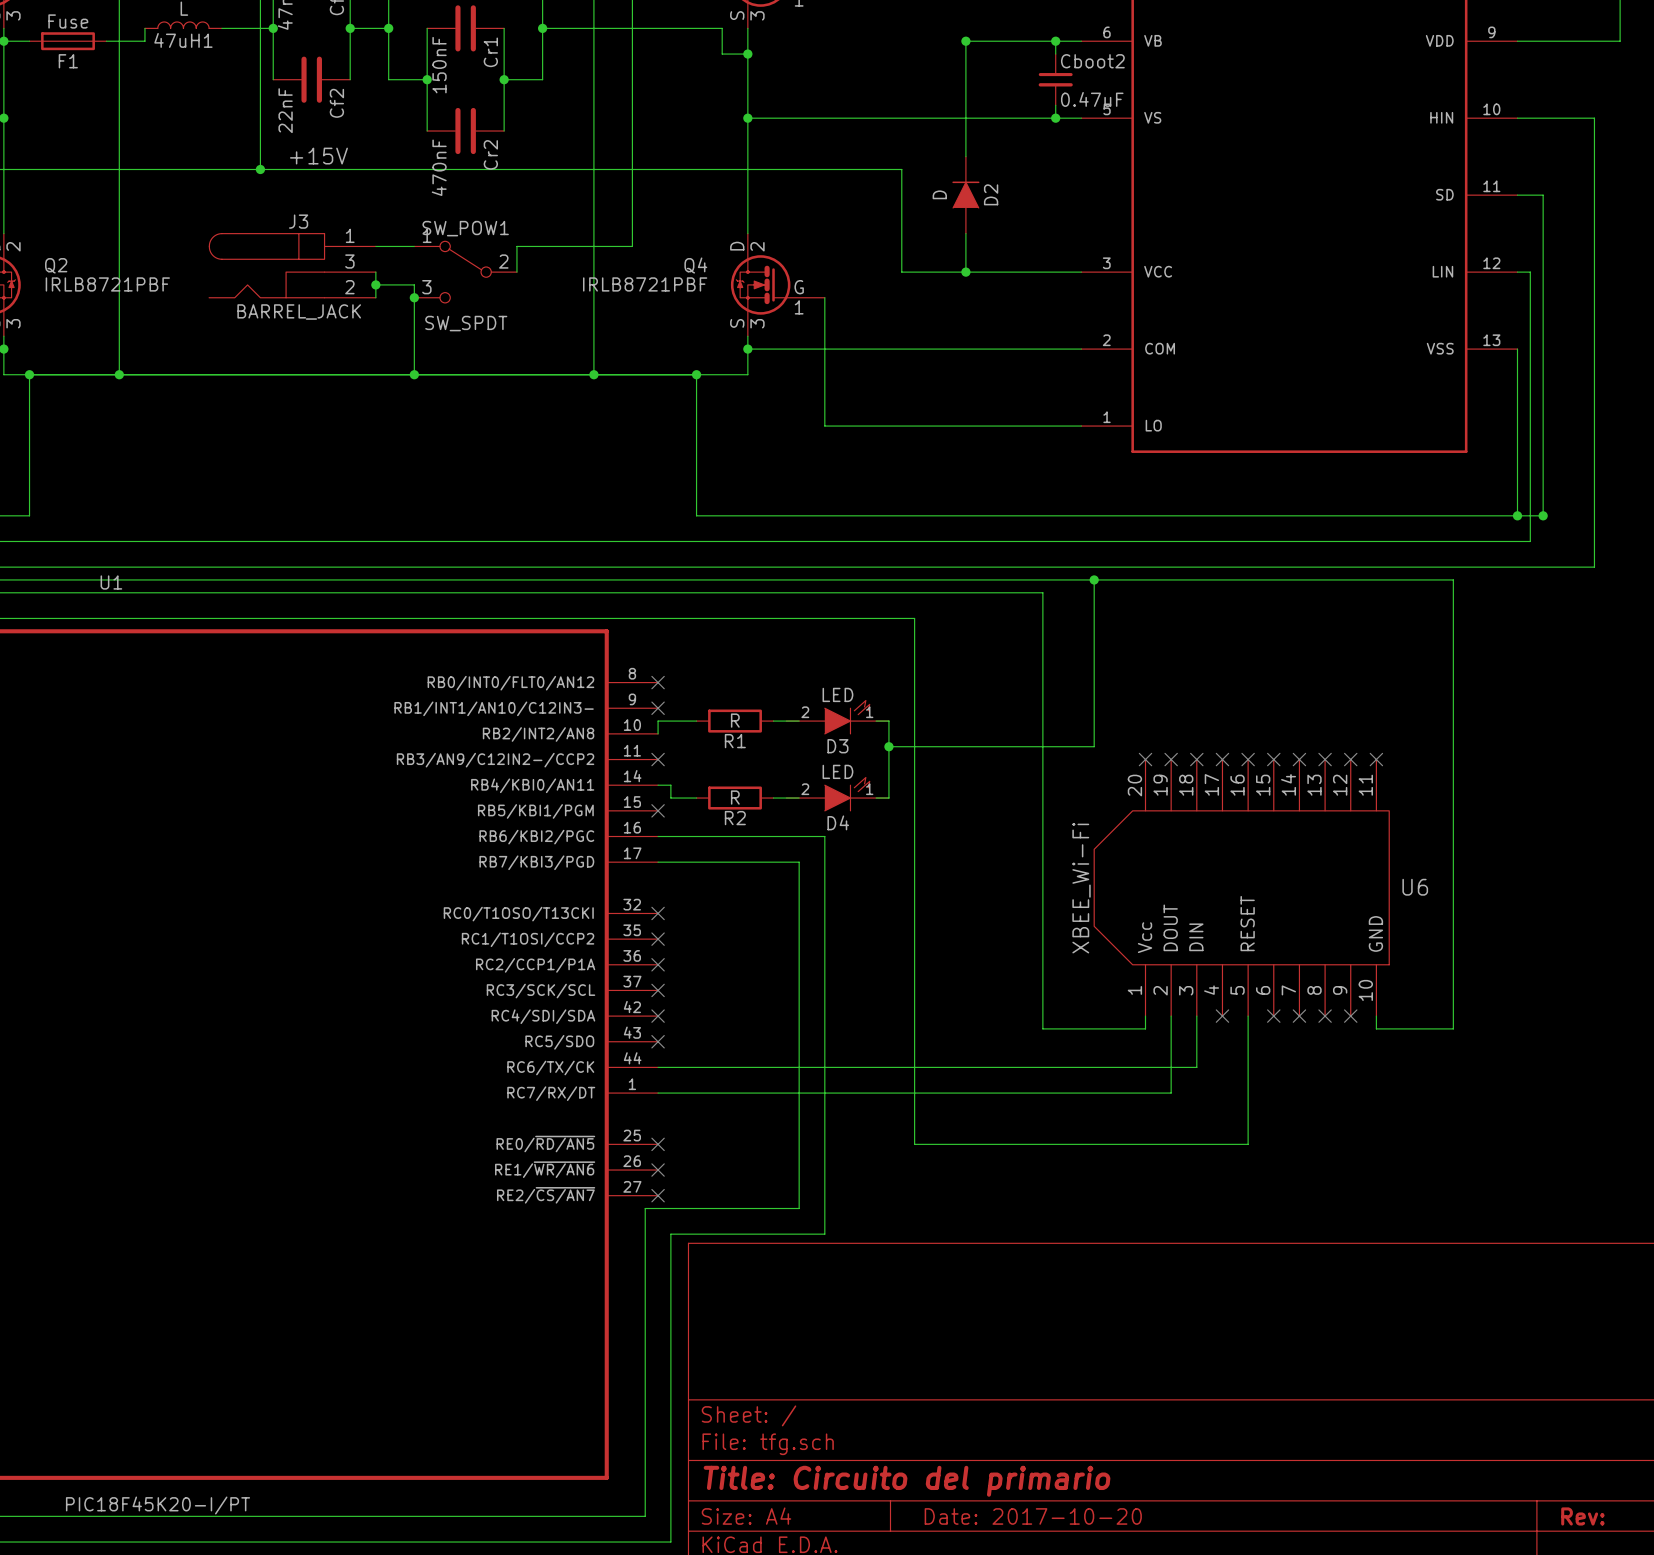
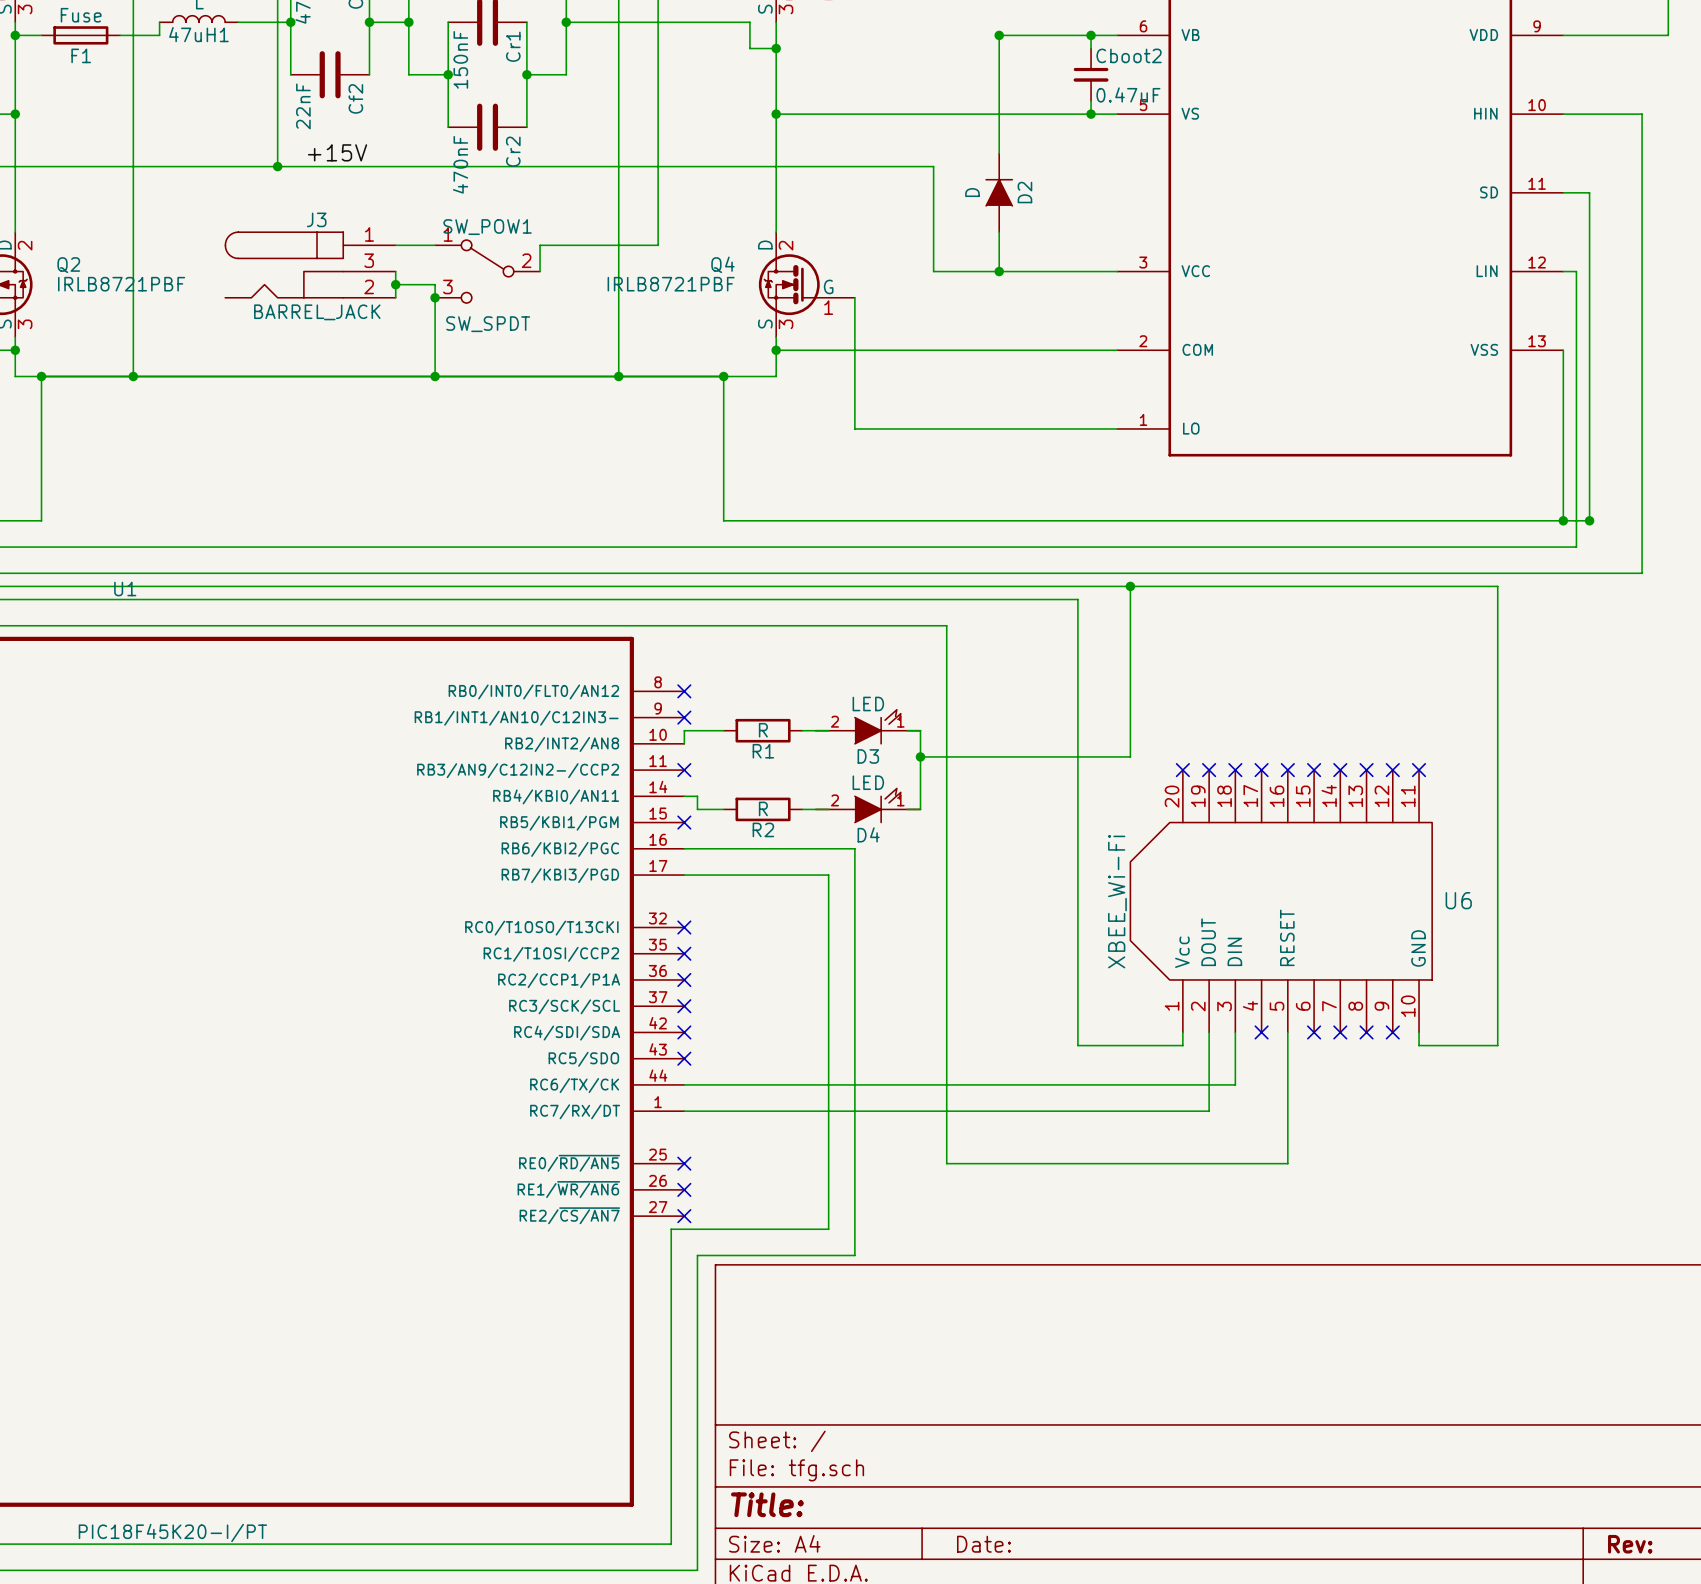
title block: Title: Circuito del primario (907, 1481) -> Title: (767, 1504)
title block: Date: 2017-10-20 (1033, 1516) -> Date: (983, 1544)

